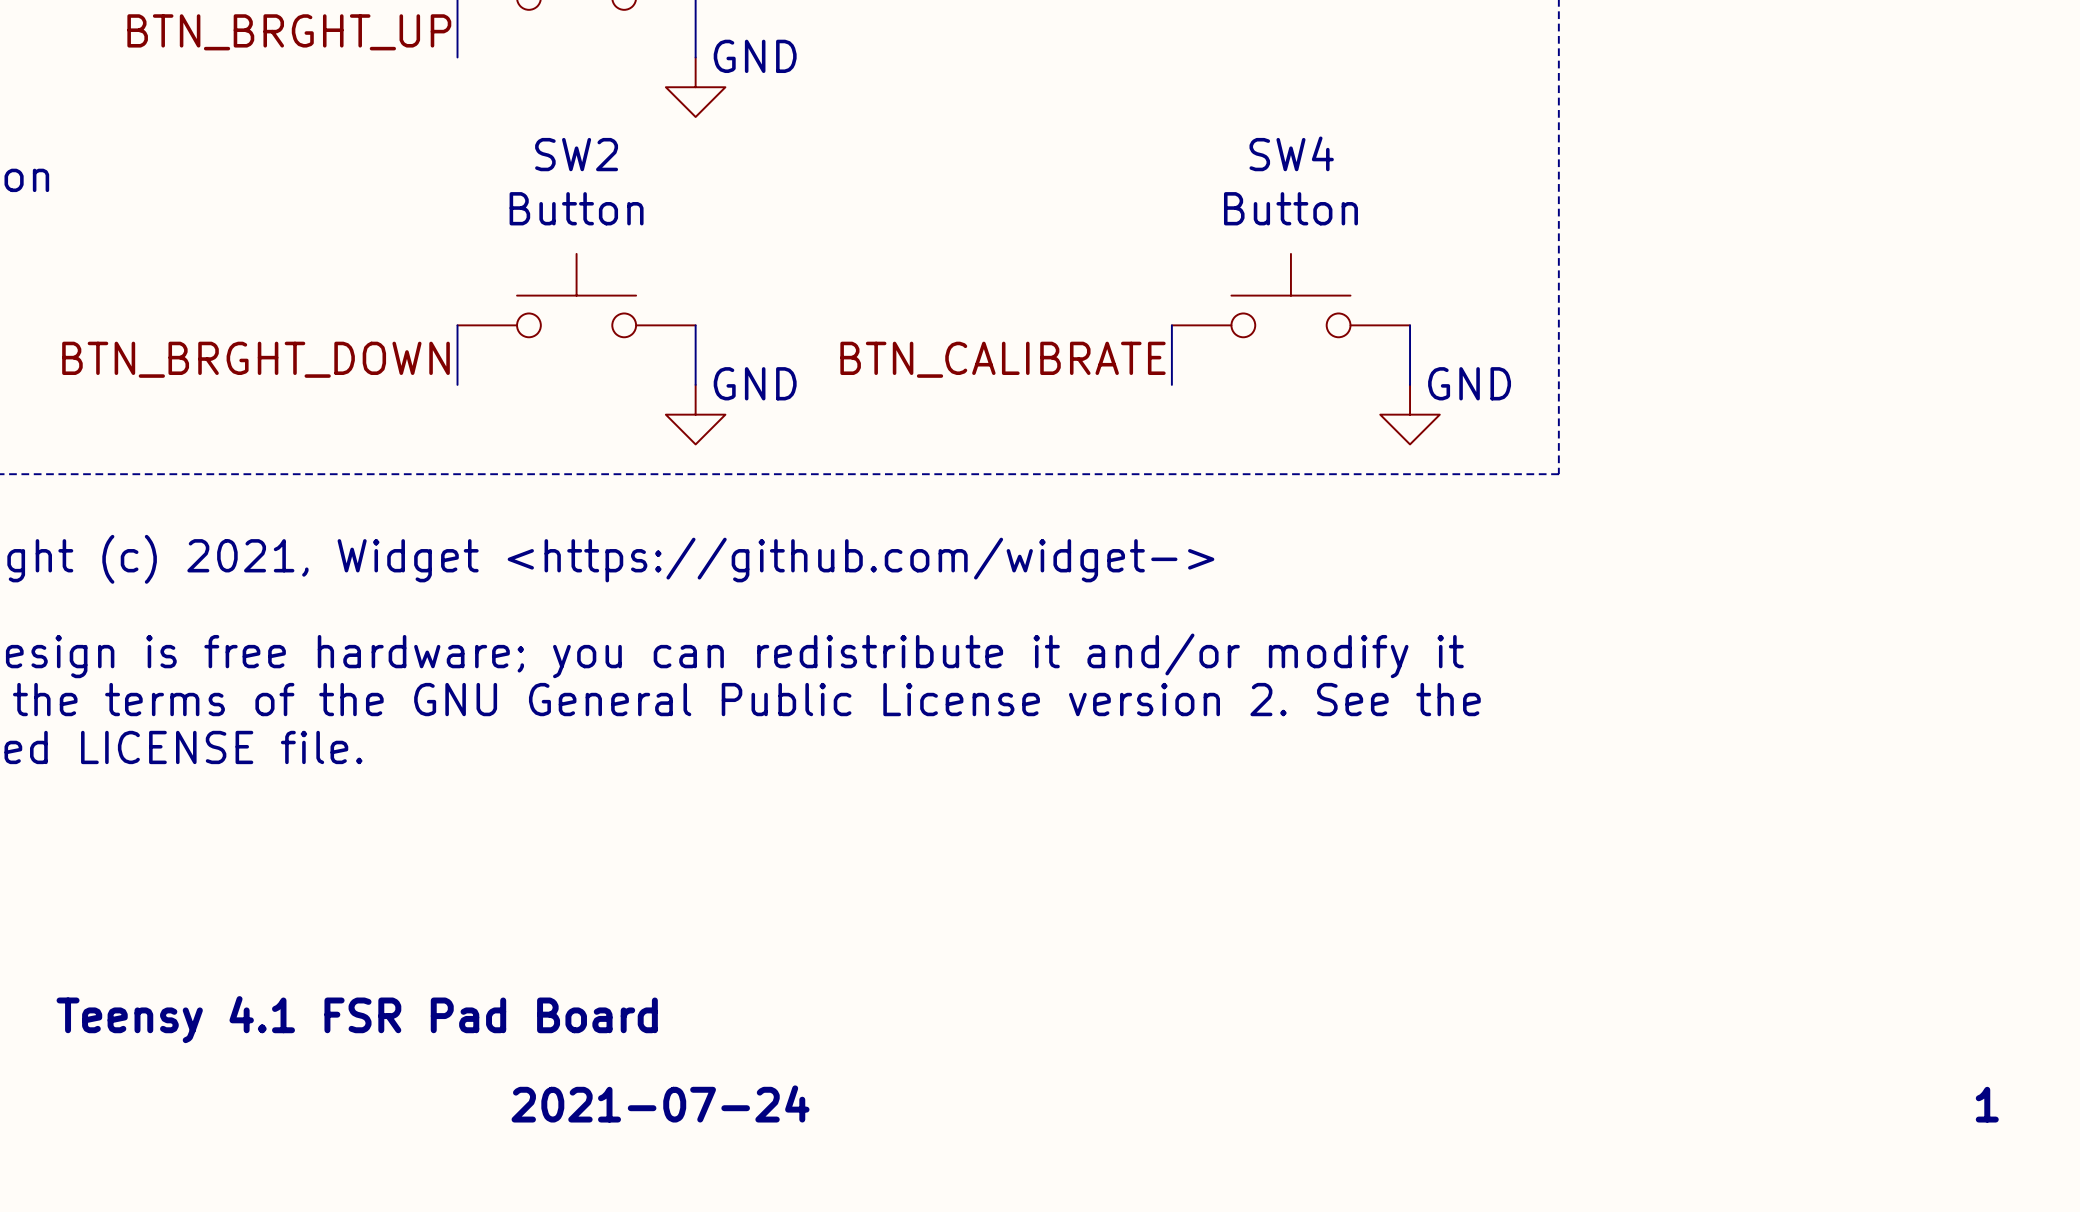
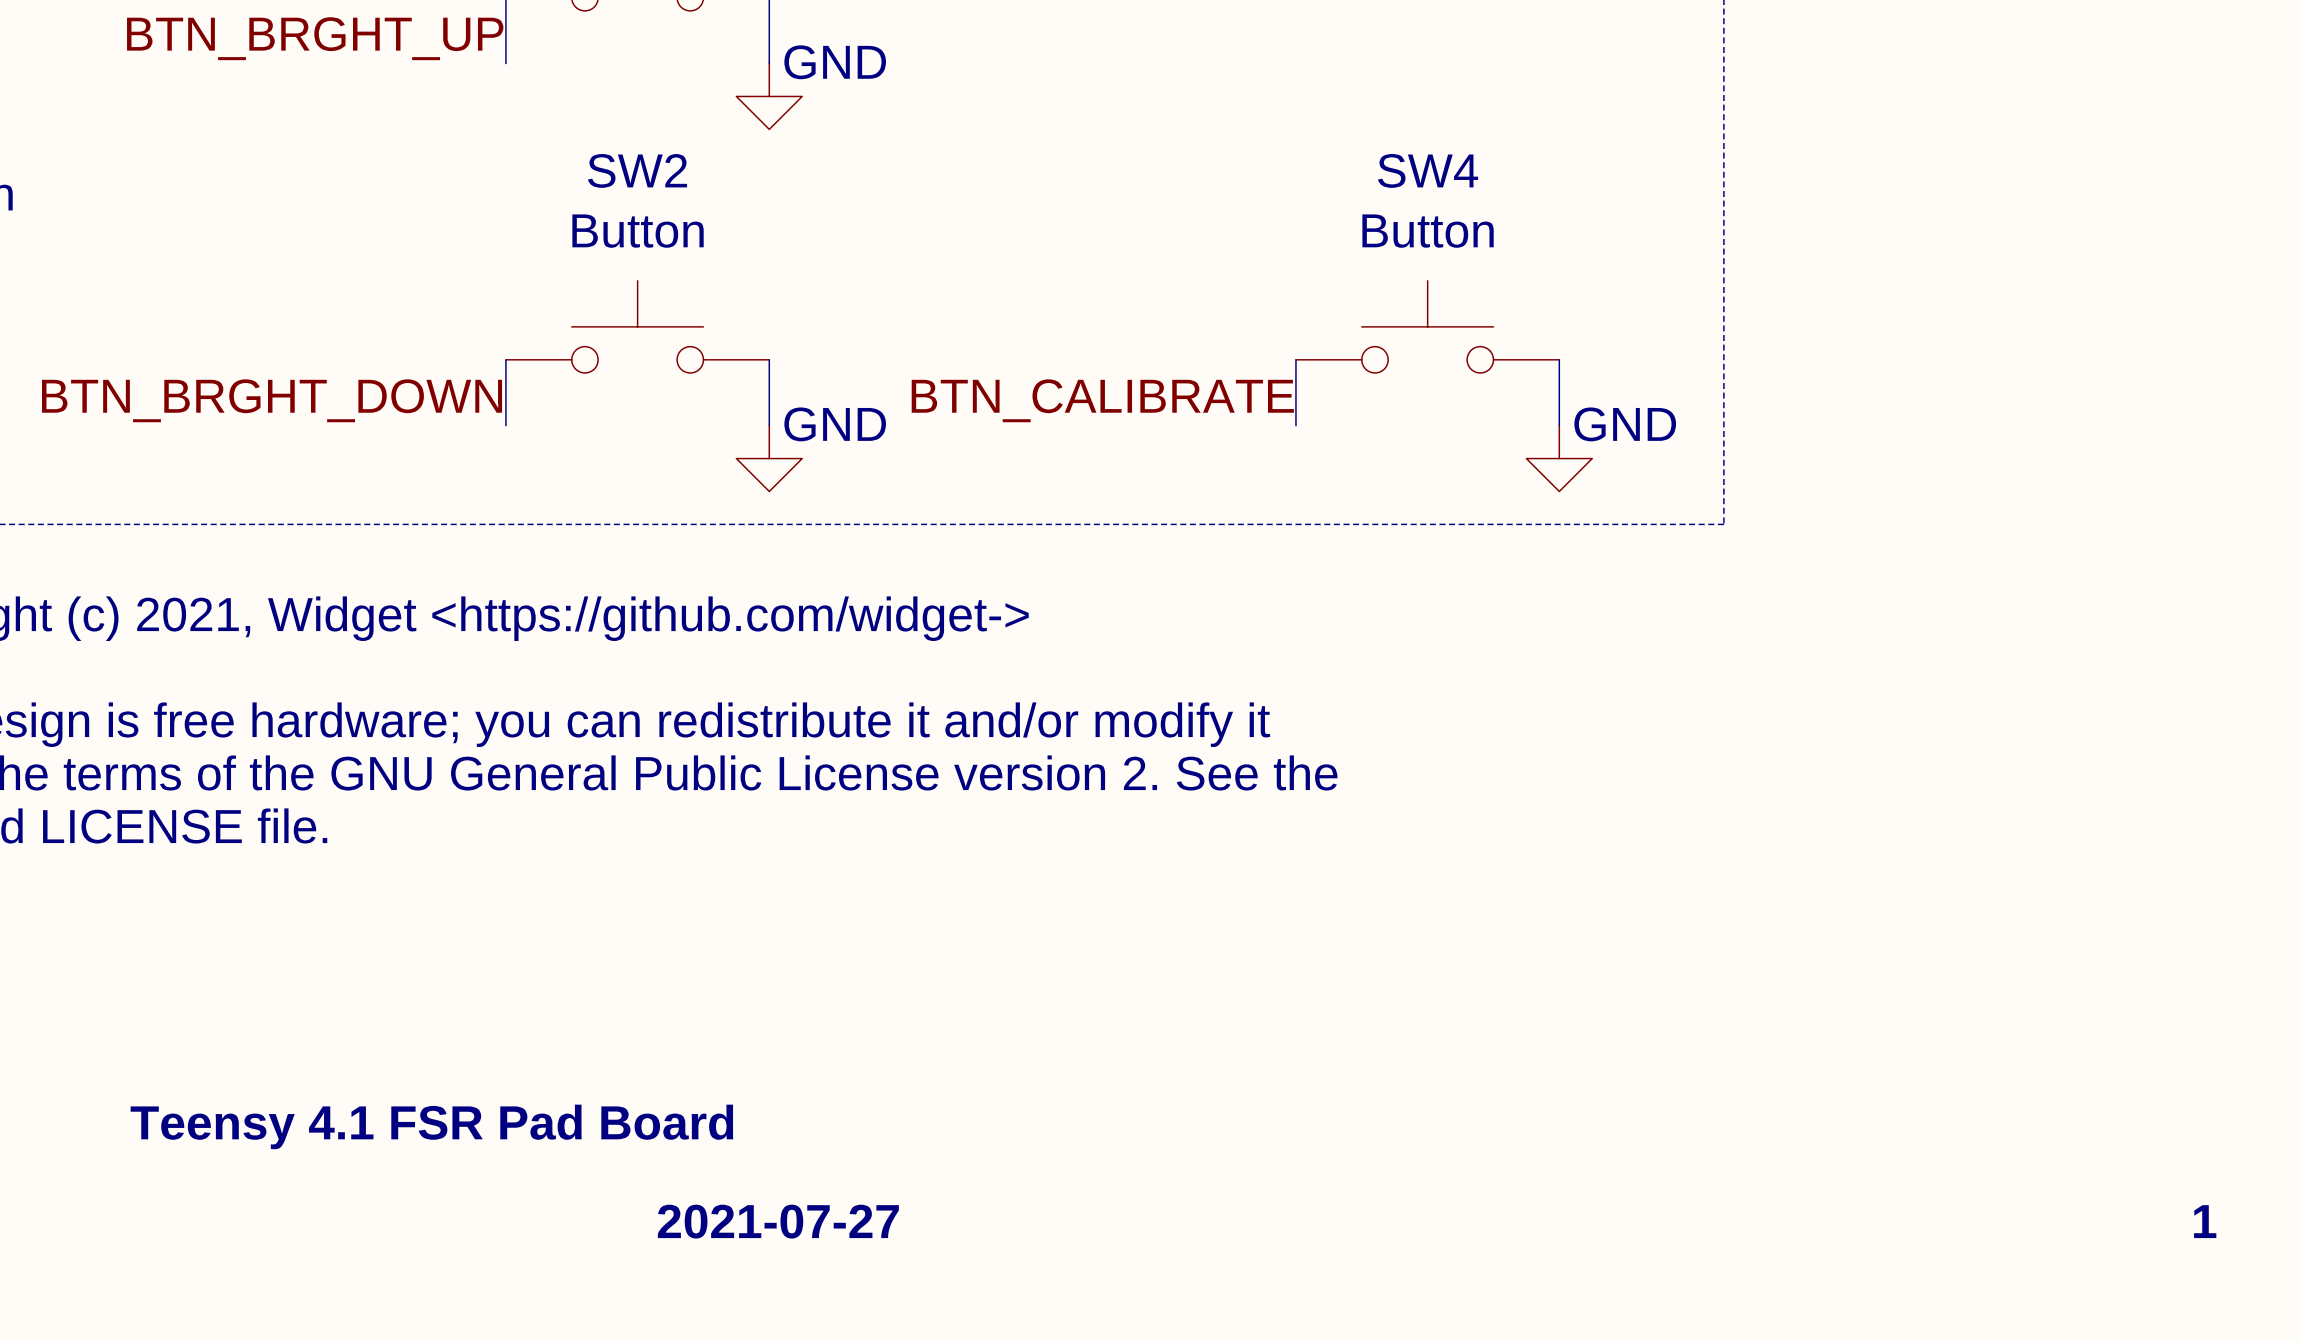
text: 2021-07-24 (660, 1103) -> 2021-07-27 (778, 1221)

